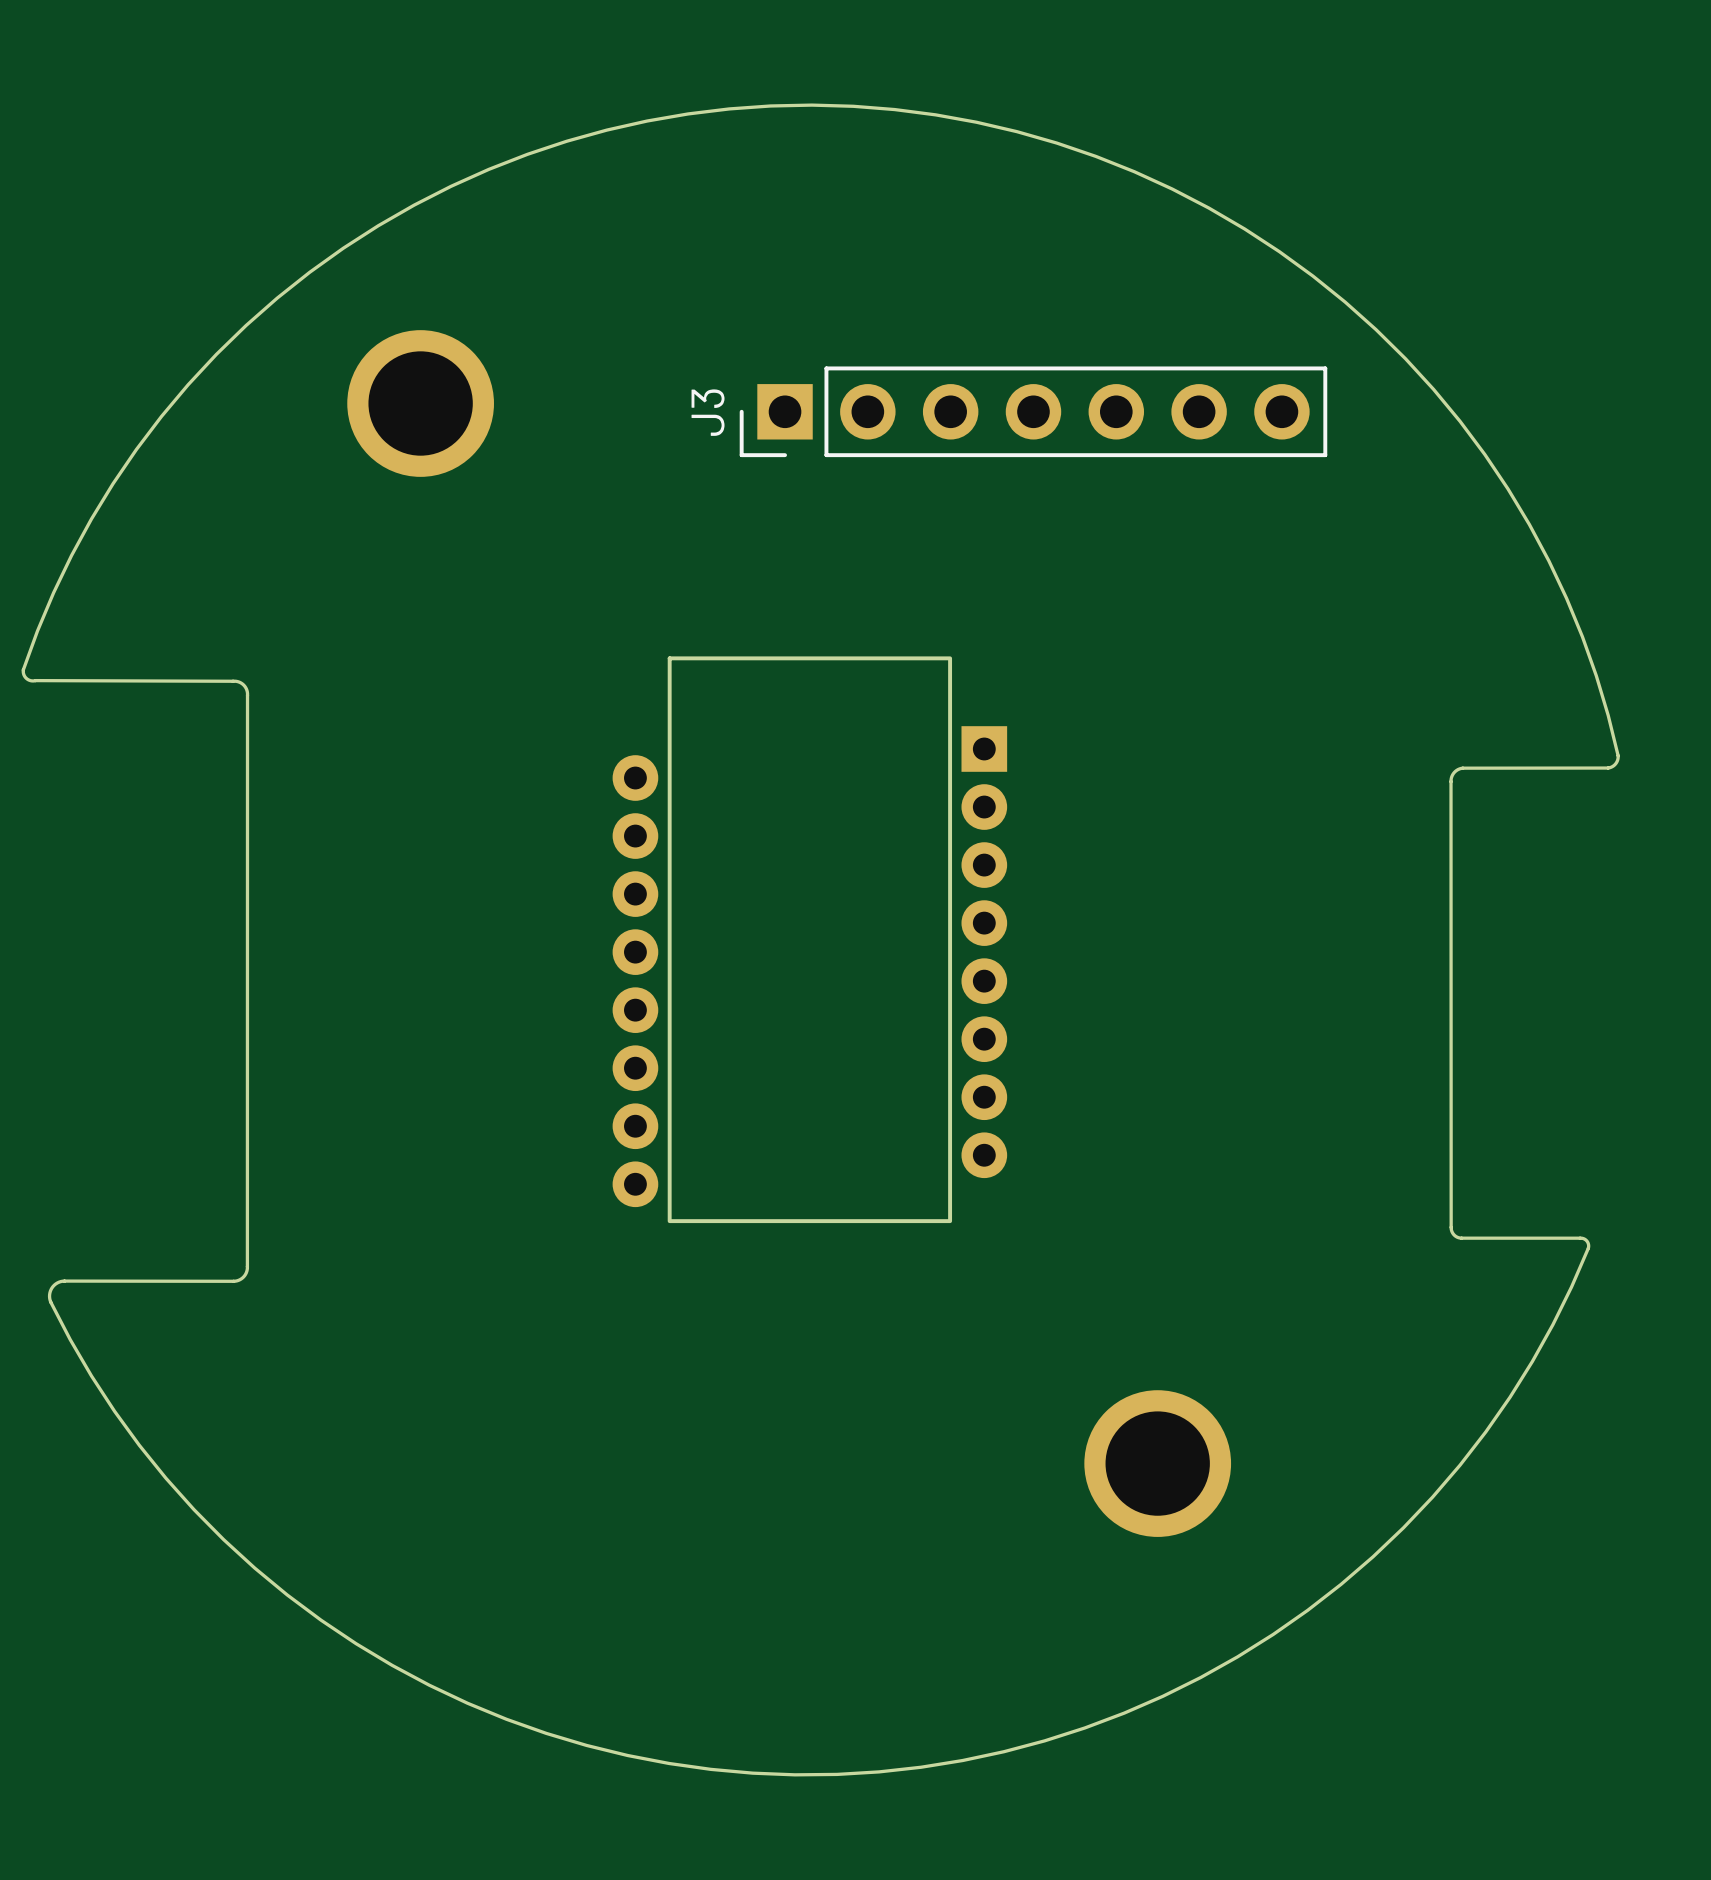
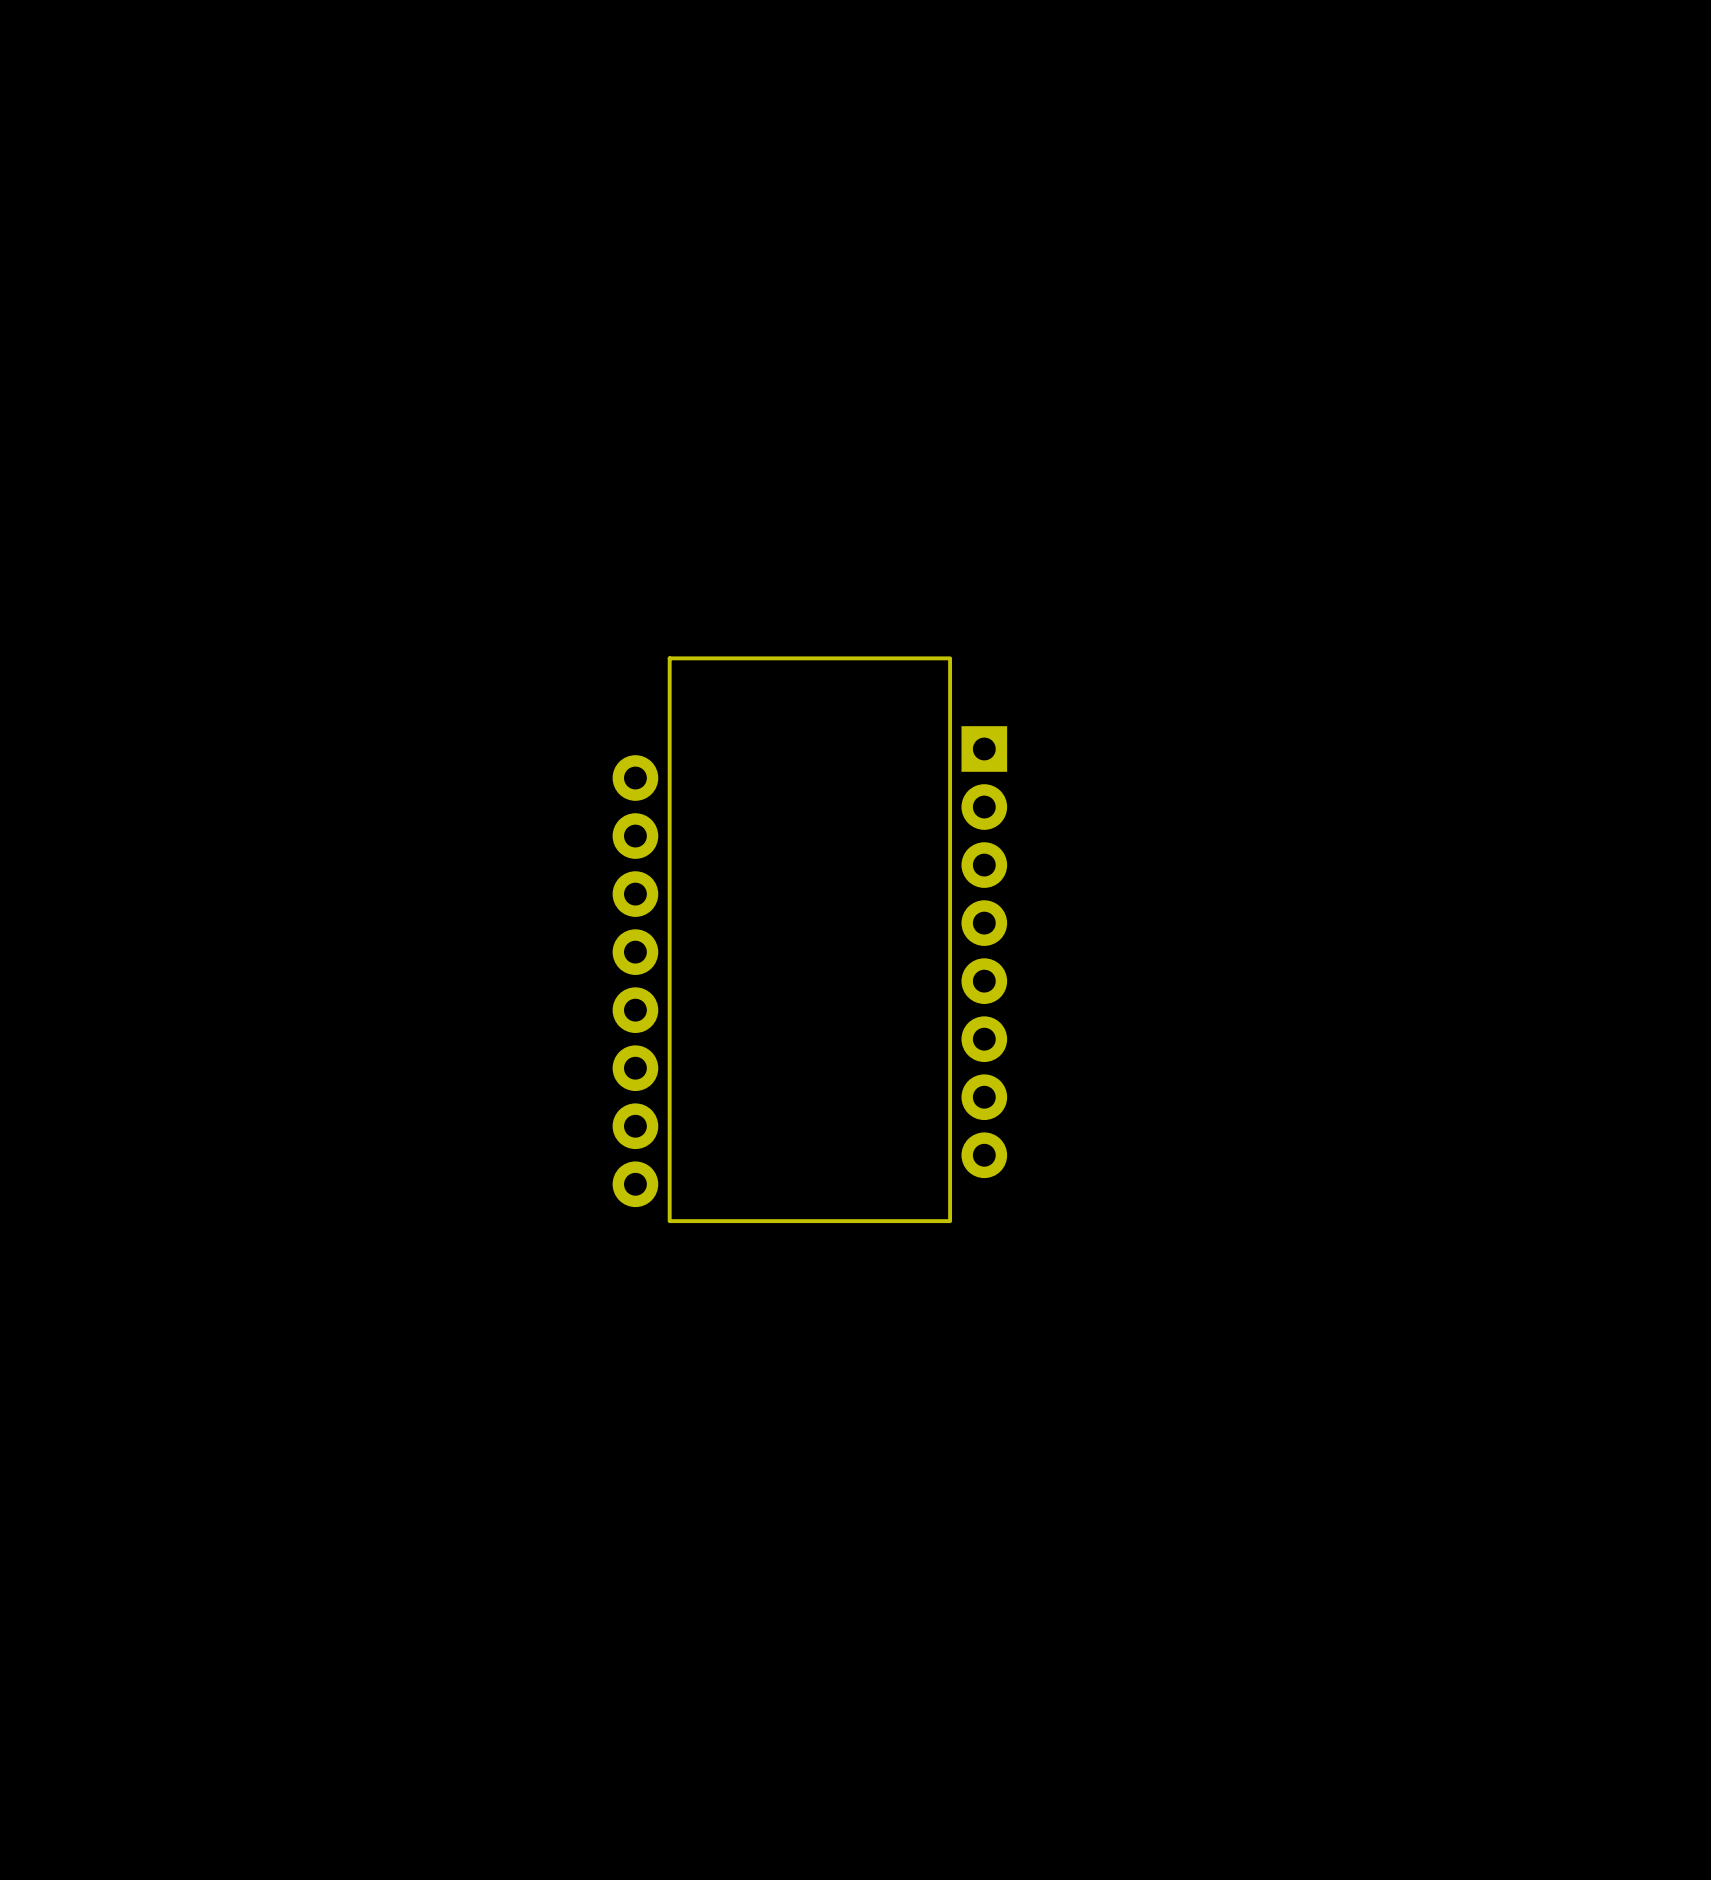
part: (420, 403) -> none
J3: (1033, 411) -> none
board edge: (23, 669) (25, 677) (31, 680) (236, 681) (244, 686) (247, 693) (246, 1271) (242, 1277) (233, 1281) (62, 1281) (55, 1283) (51, 1289) (50, 1302) (70, 1339) (114, 1411) (165, 1478) (223, 1539) (287, 1594) (356, 1643) (429, 1685) (506, 1719) (586, 1745) (669, 1763) (752, 1773) (837, 1774) (921, 1767) (1003, 1751) (1084, 1727) (1162, 1696) (1237, 1656) (1307, 1610) (1372, 1556) (1403, 1527) (1460, 1465) (1509, 1397) (1552, 1324) (1588, 1248) (1587, 1241) (1581, 1238) (1460, 1238) (1454, 1234) (1451, 1228) (1451, 778) (1455, 771) (1462, 768) (1608, 768) (1616, 762) (1618, 755) (1596, 675) (1566, 598) (1529, 524) (1484, 454) (1433, 389) (1376, 329) (1312, 276) (1244, 229) (1172, 189) (1096, 156) (1016, 131) (935, 114) (853, 106) (770, 105) (688, 113) (606, 130) (527, 154) (451, 186) (378, 225) (309, 272) (246, 325) (188, 384) (136, 449) (91, 519) (53, 592) (23, 669) -> none
part: (1157, 1463) -> none

